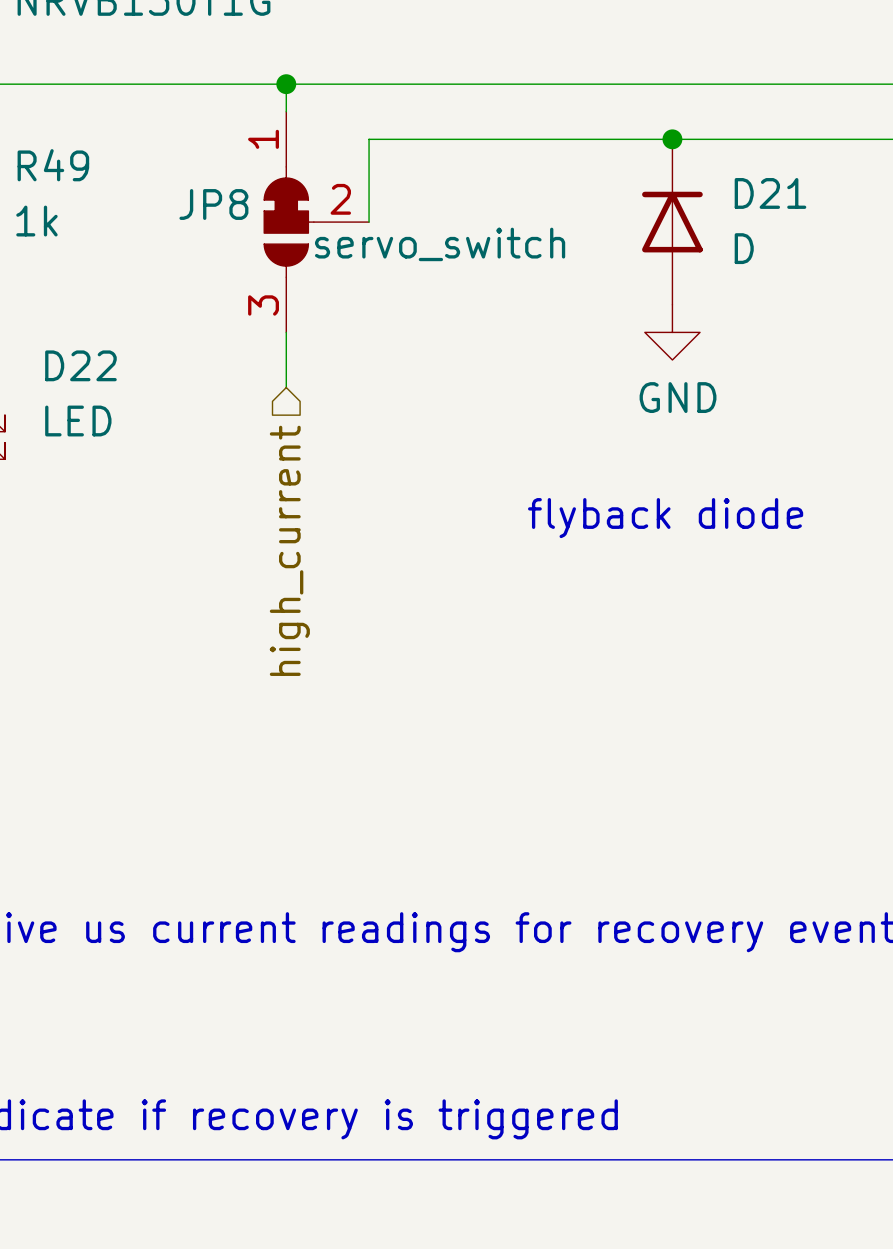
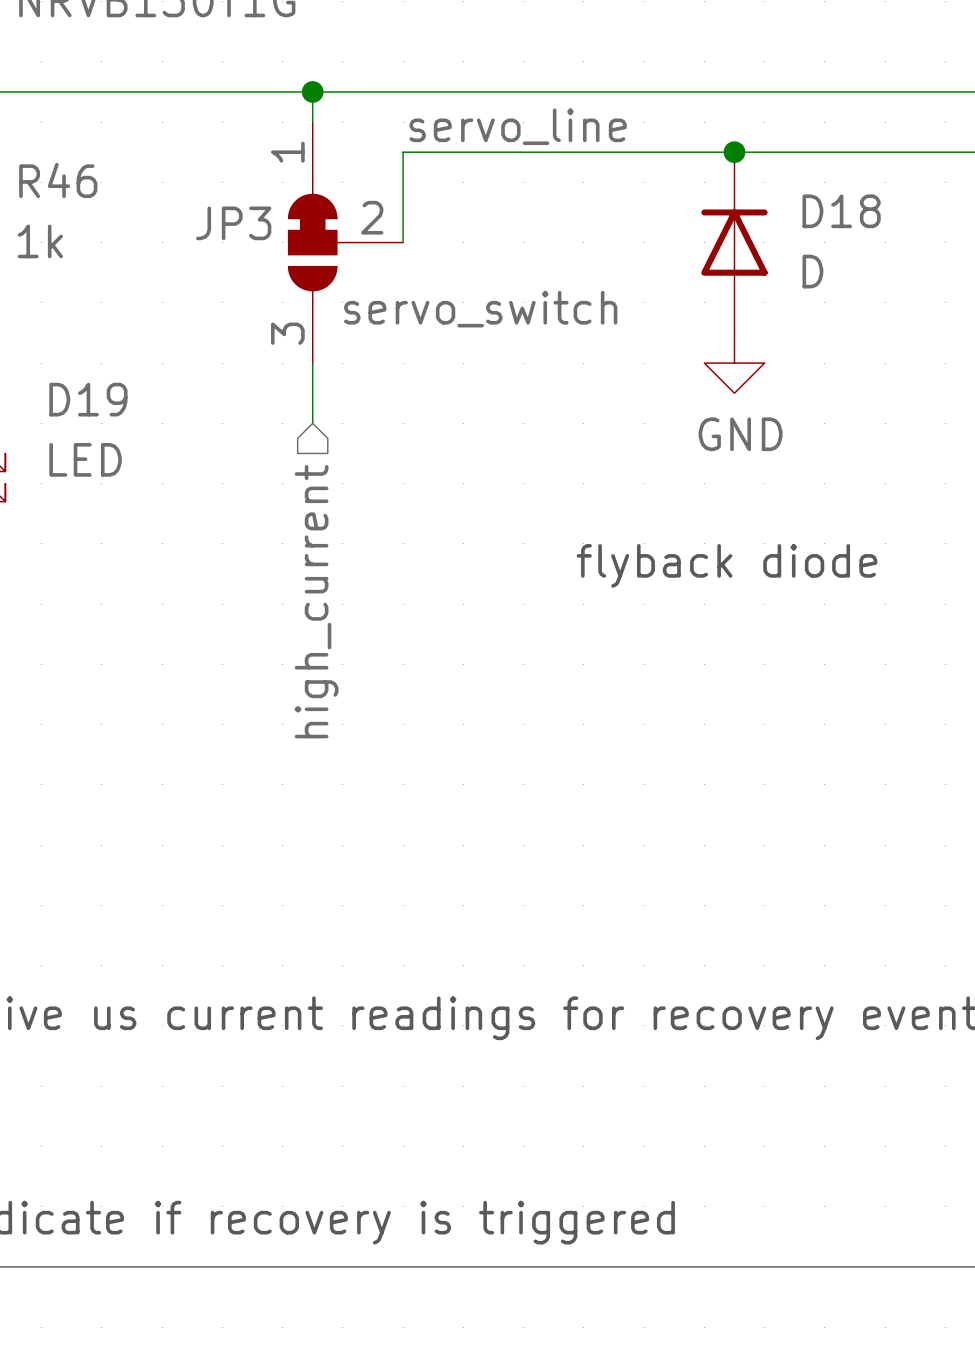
label: none -> servo_line (518, 126)
R49 name: R49 (53, 165) -> R46 (58, 180)
D21 name: D21 (770, 193) -> D18 (841, 211)
JP8 name: JP8 (213, 204) -> JP3 (233, 223)
JP8 value position: servo_switch (440, 244) -> servo_switch (480, 309)
D22 name: D22 (80, 365) -> D19 (88, 399)

